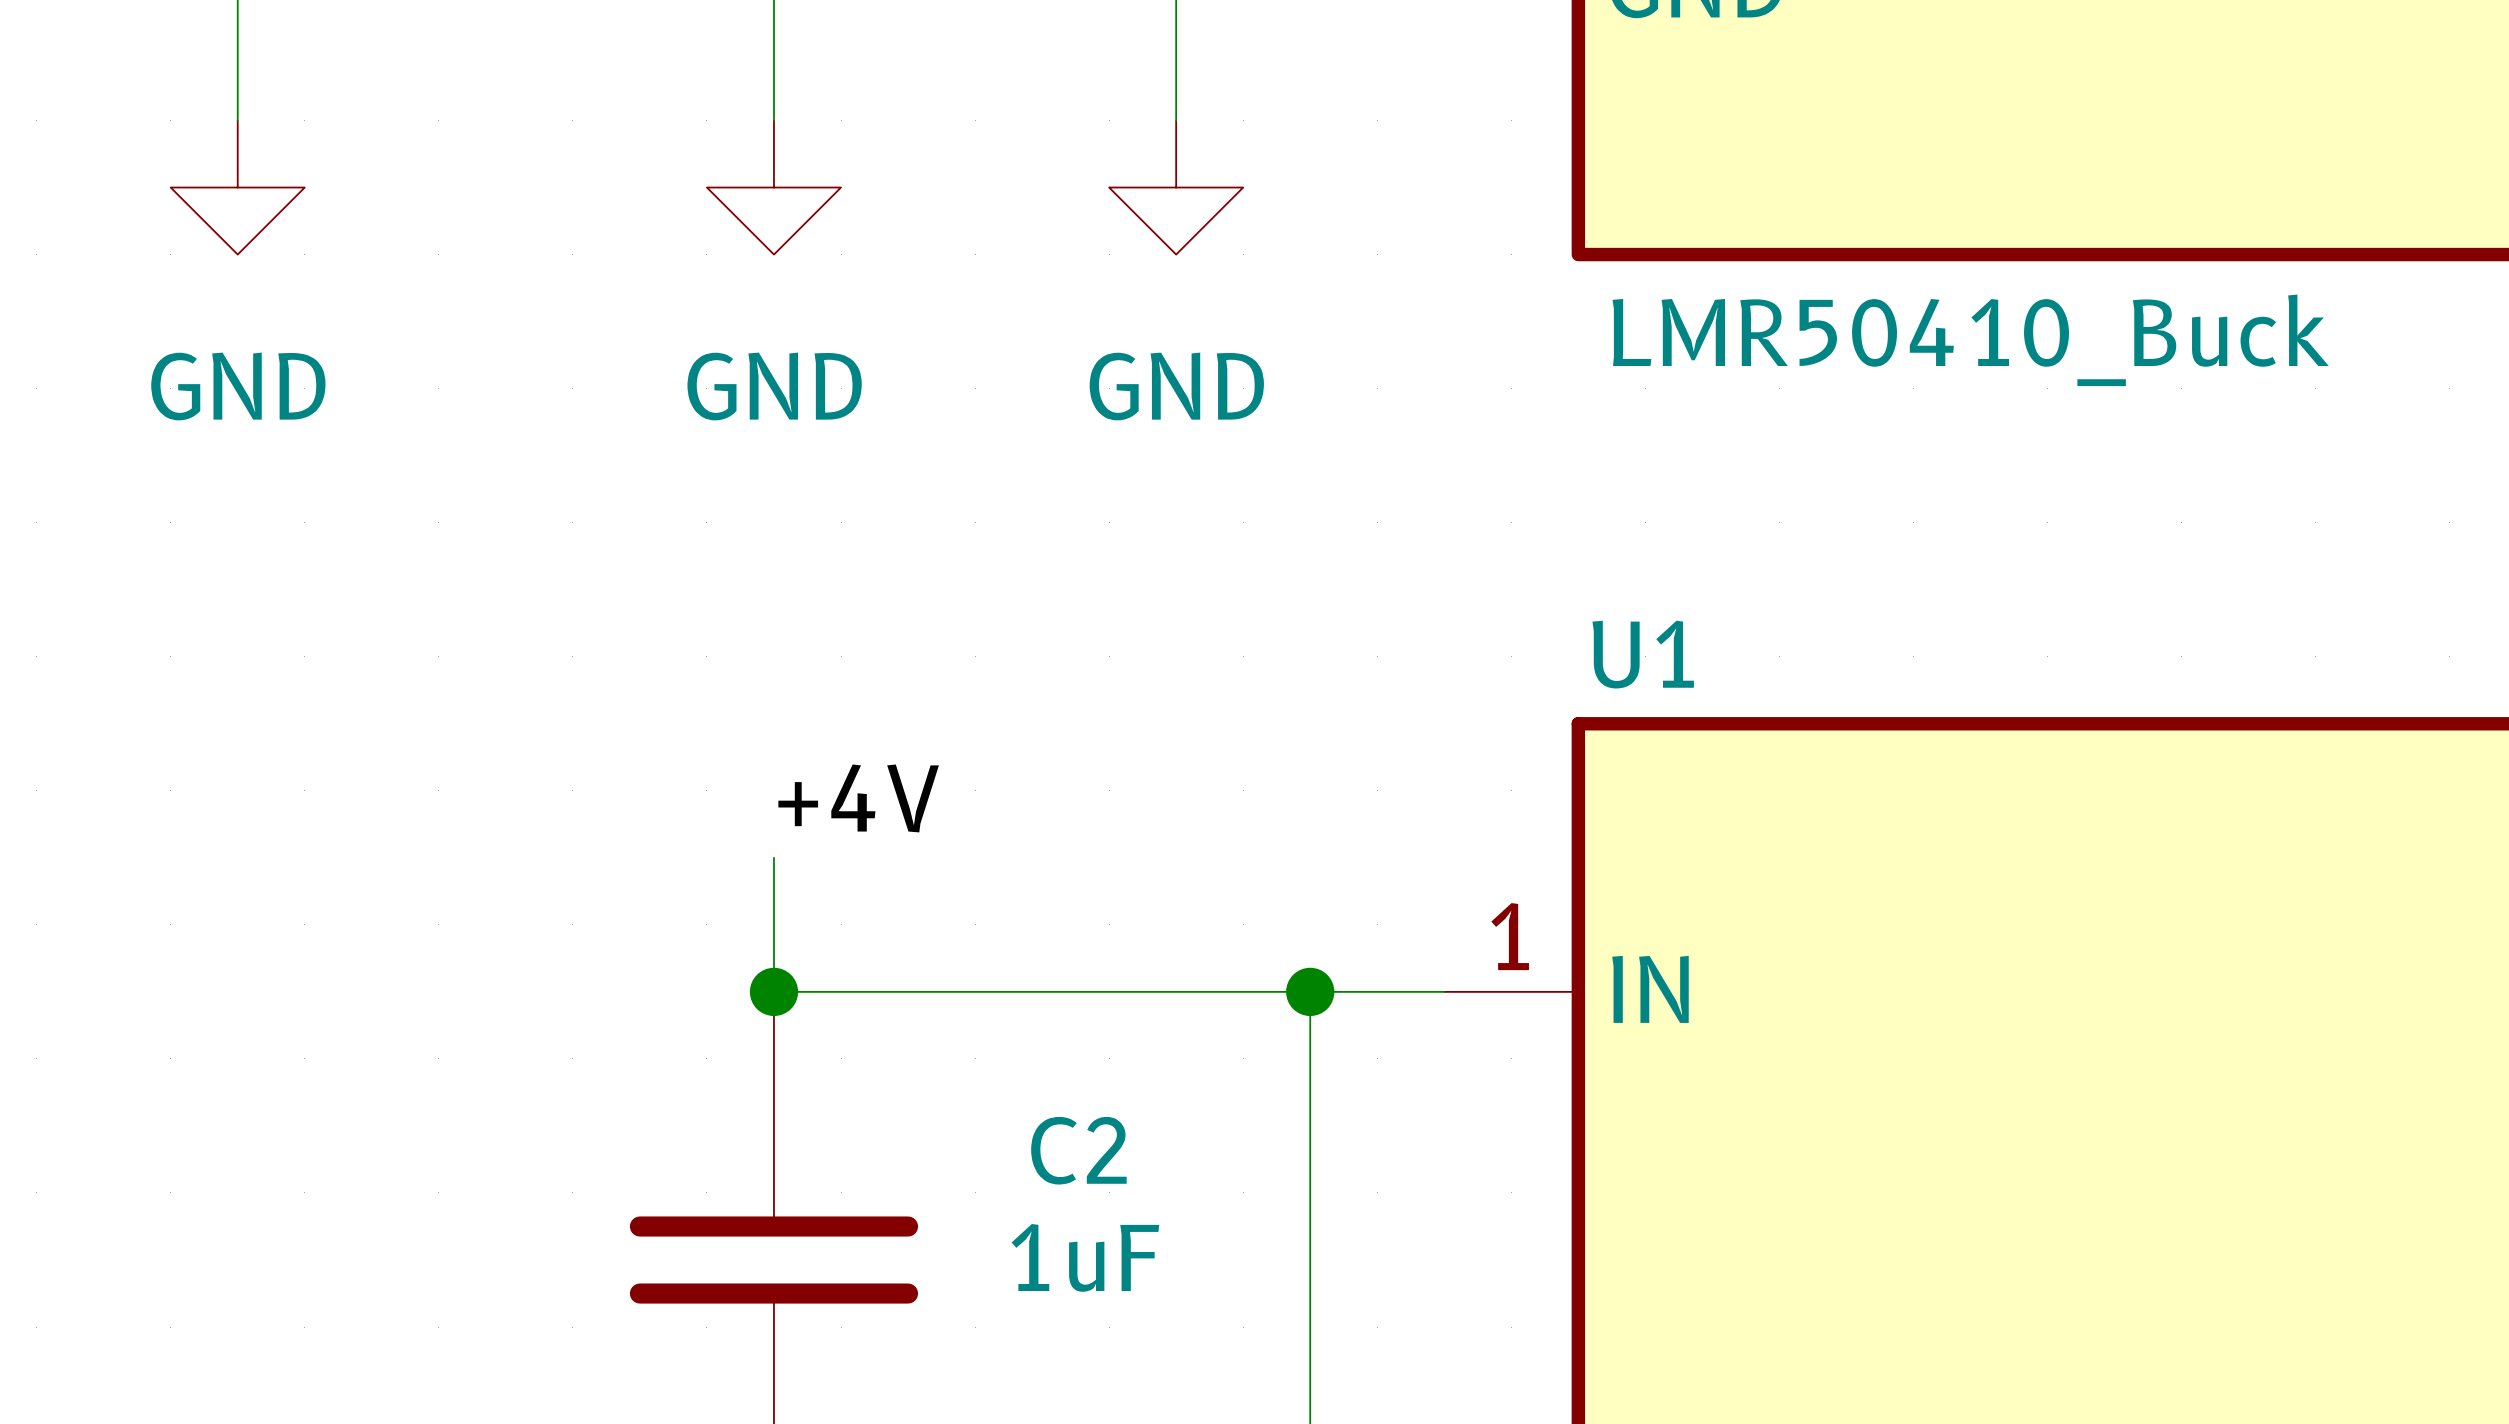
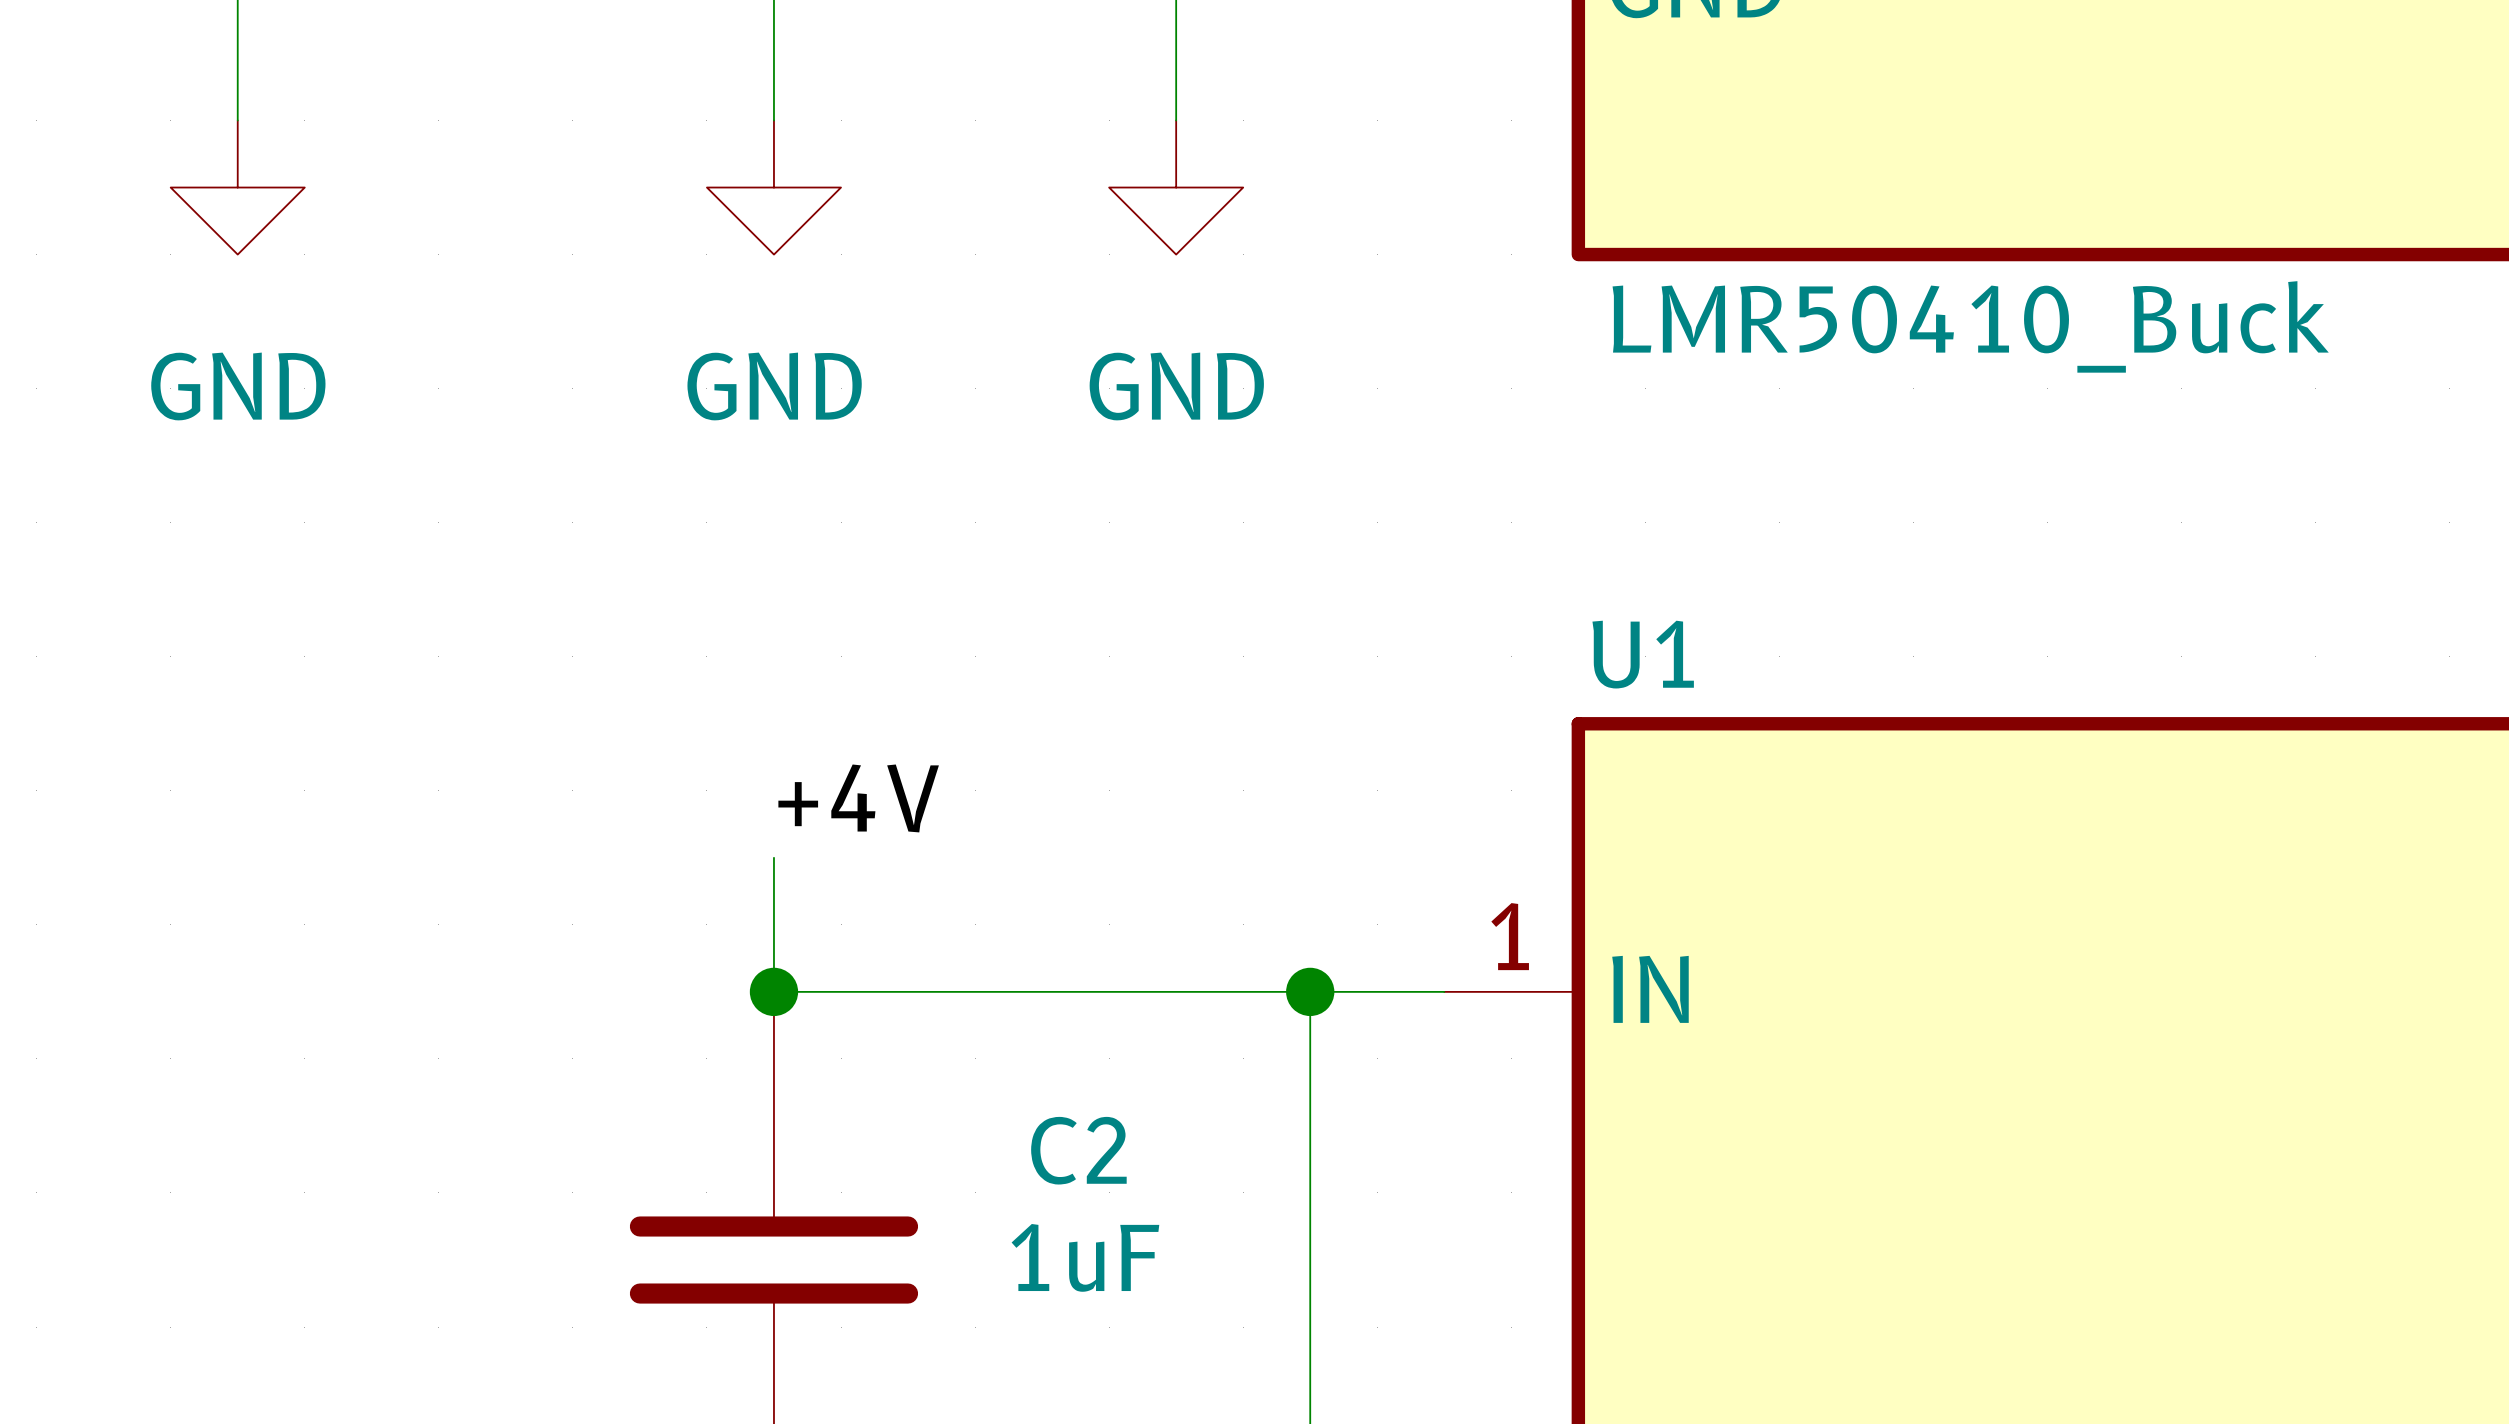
part value position: LMR50410_Buck (1970, 340) -> LMR50410_Buck (1970, 326)

